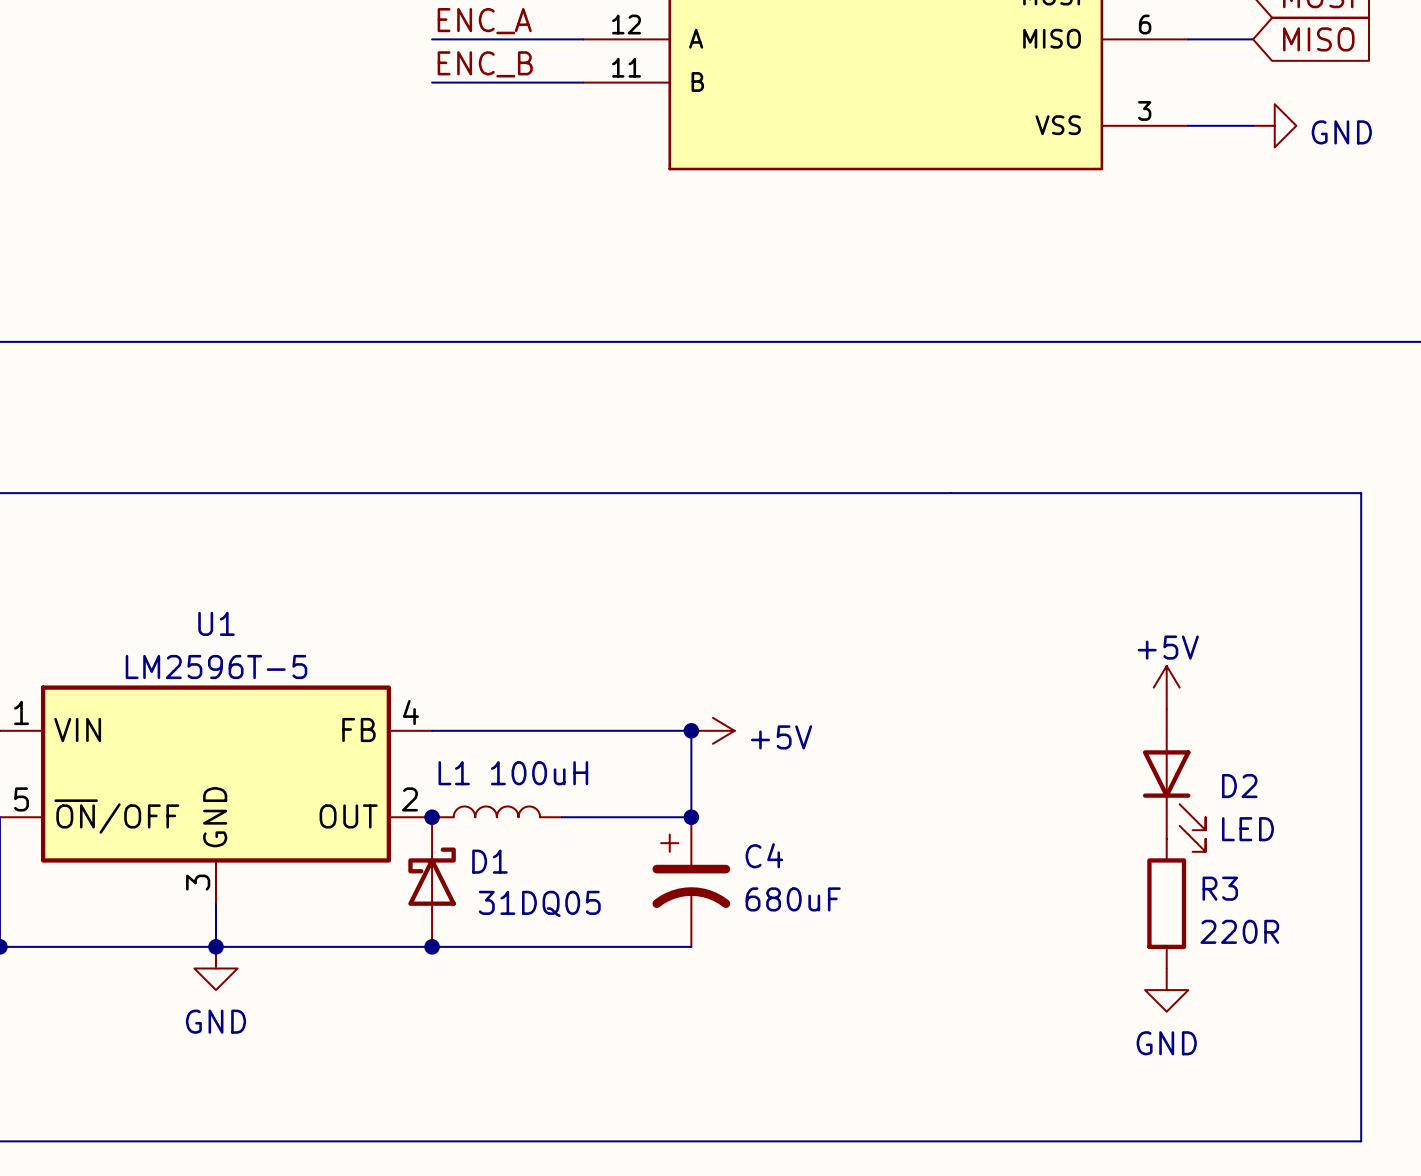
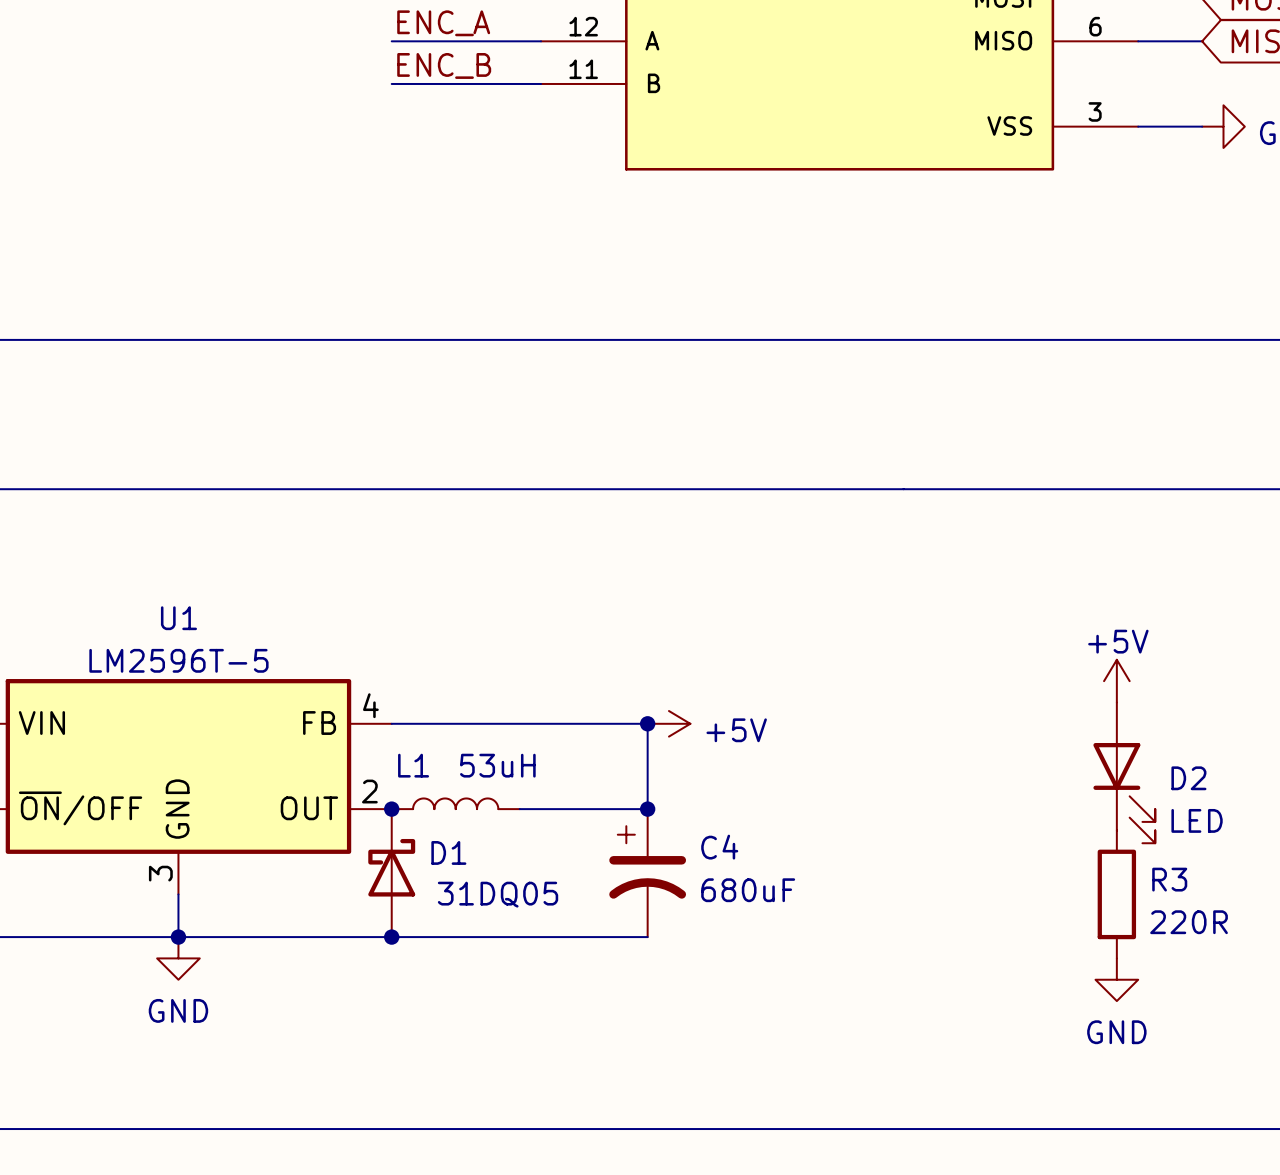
L1 value: 100uH (539, 773) -> 53uH (497, 765)

